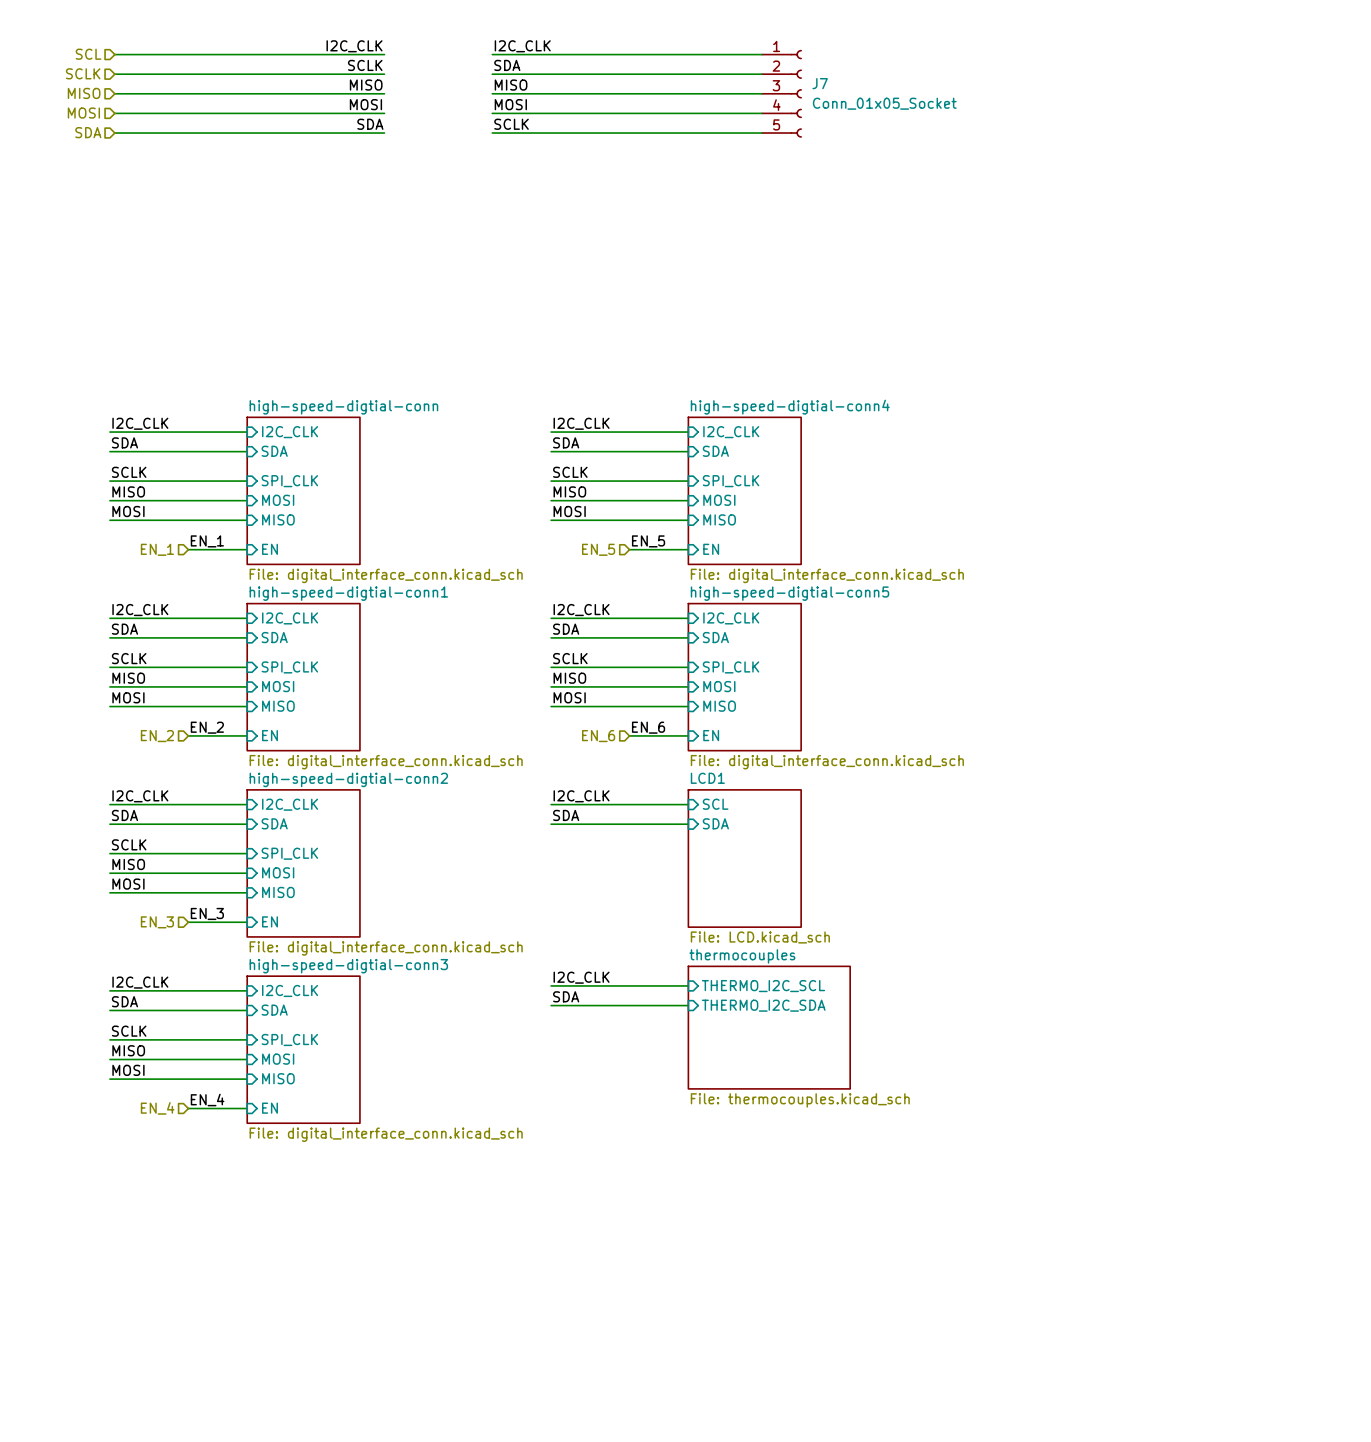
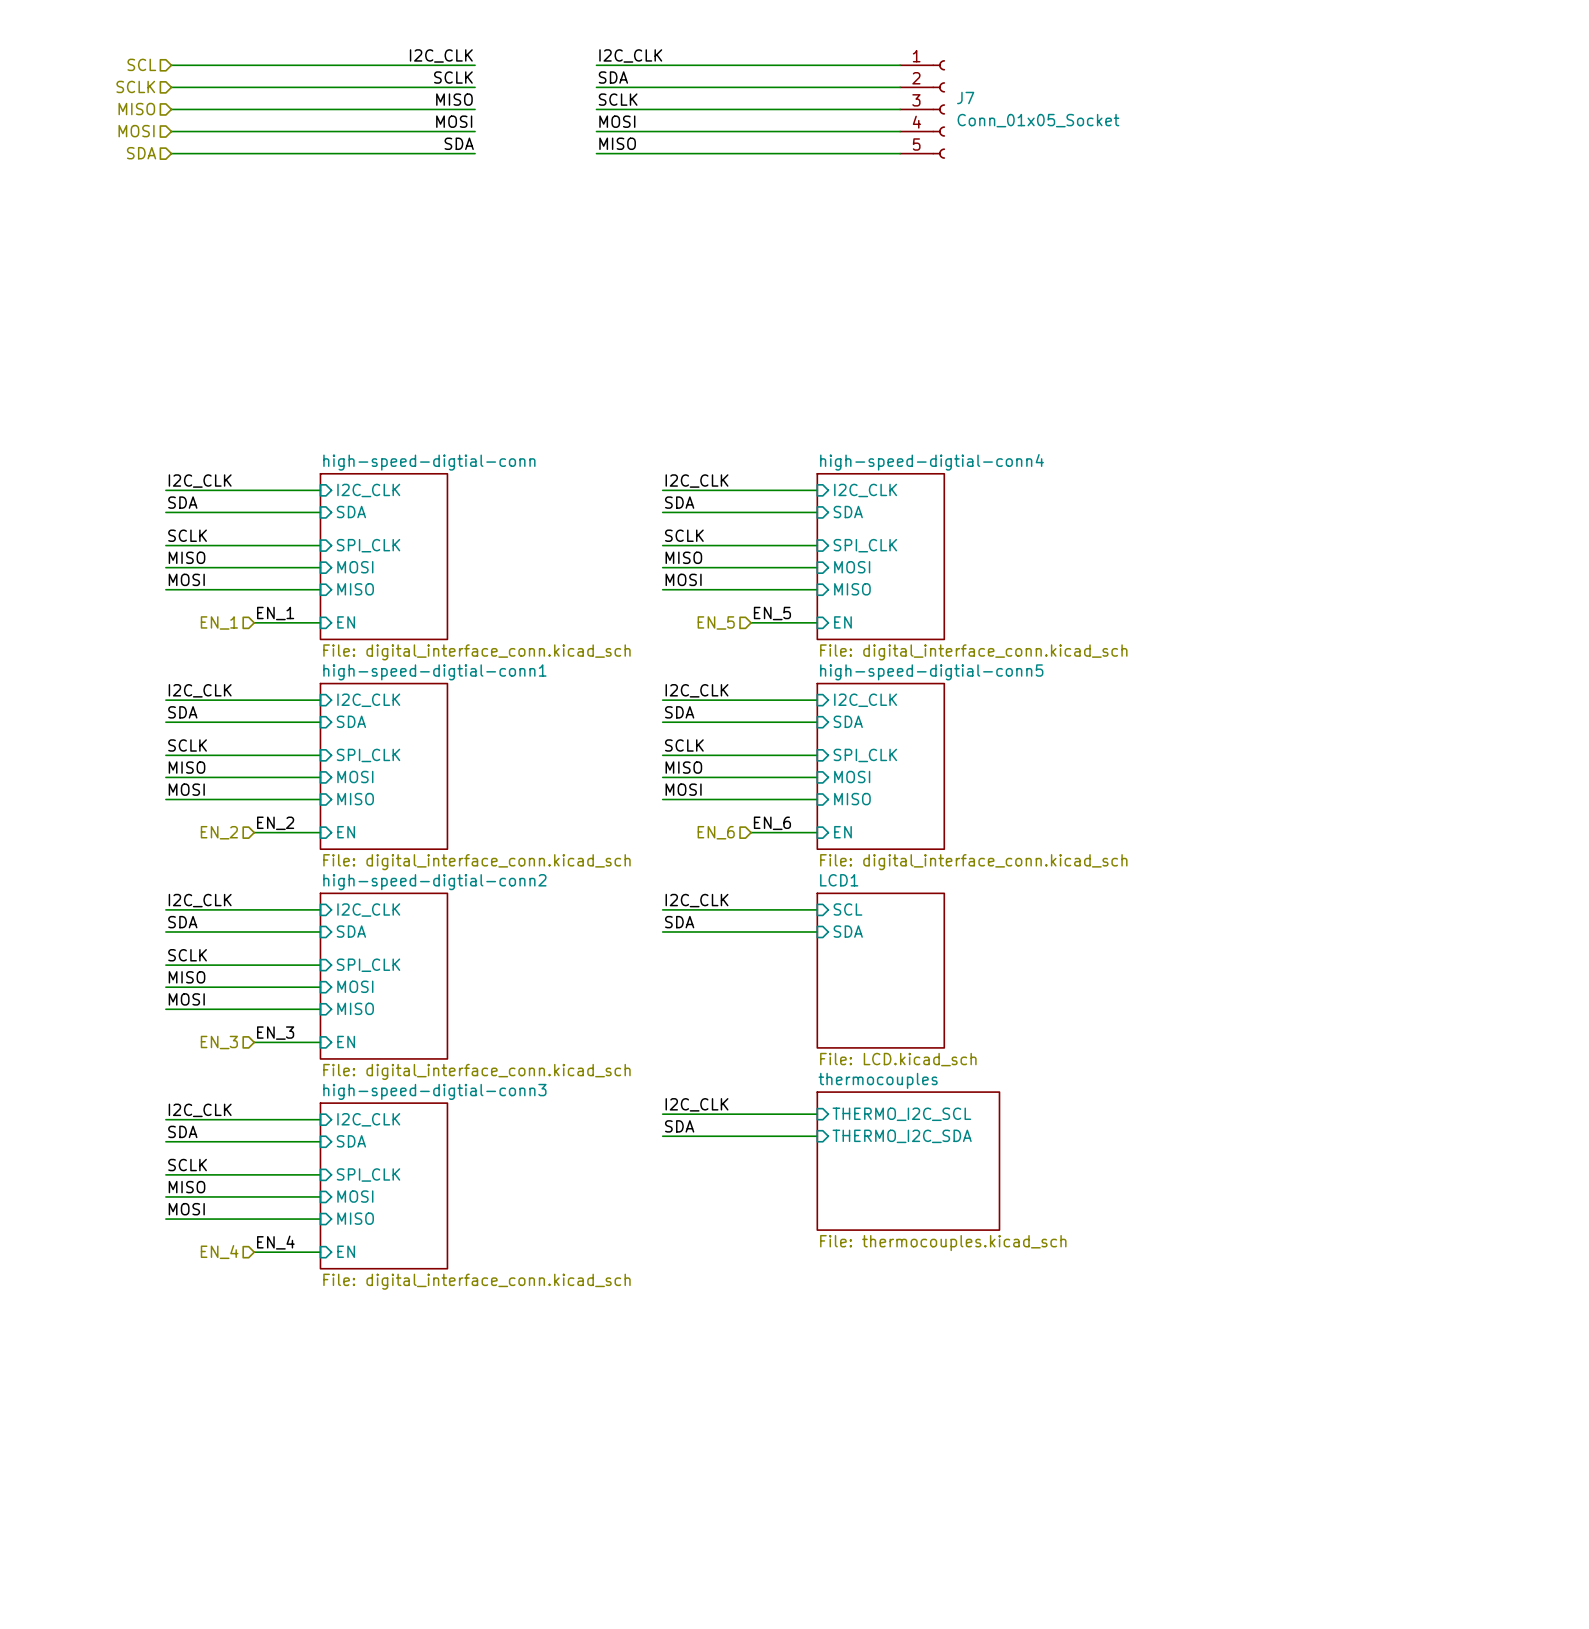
label: MISO (511, 85) -> SCLK (618, 99)
label: SCLK (511, 124) -> MISO (617, 143)

